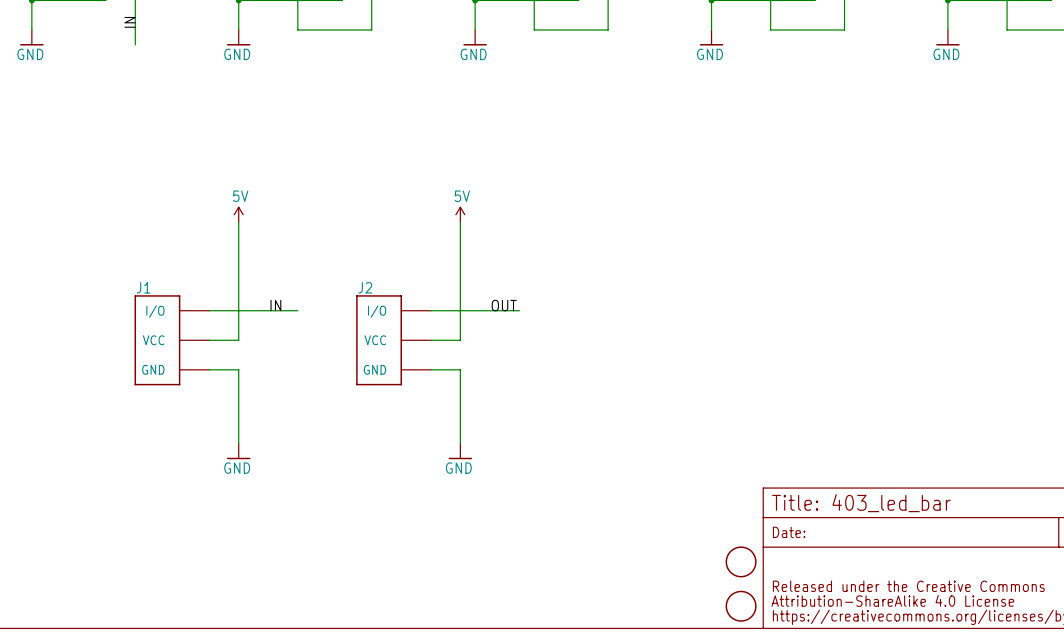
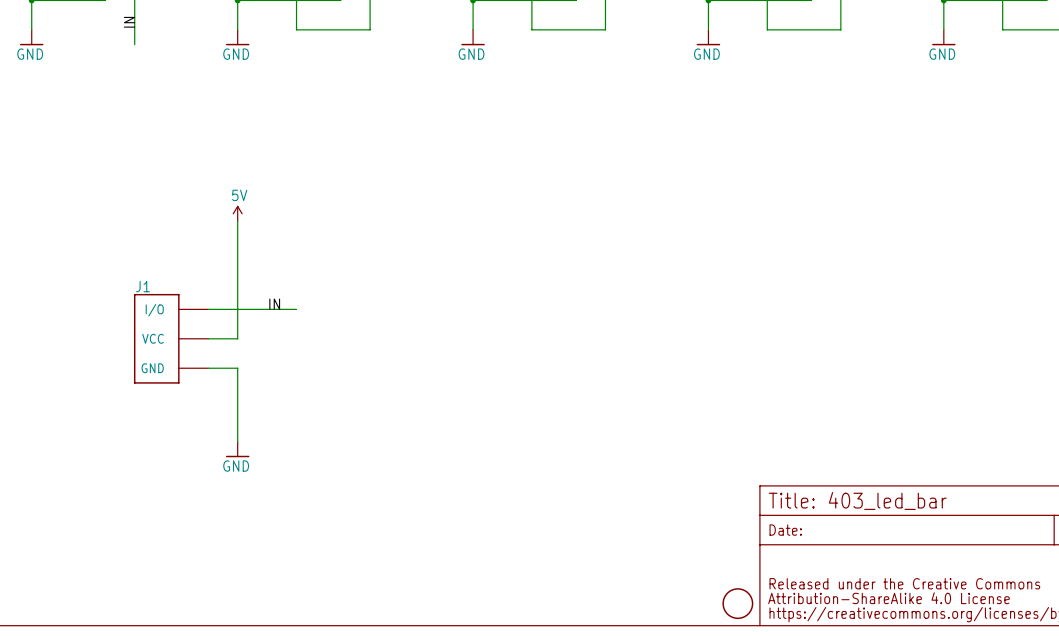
power symbol: 5V (460, 214) -> none
wire: (460, 222) (460, 340) (430, 340) -> none
label: OUT (504, 305) -> none
wire: (430, 310) (519, 310) -> none
J2: (393, 340) -> none
wire: (430, 369) (460, 369) (460, 443) -> none
power symbol: GND (460, 451) -> none
part: (741, 561) -> none

